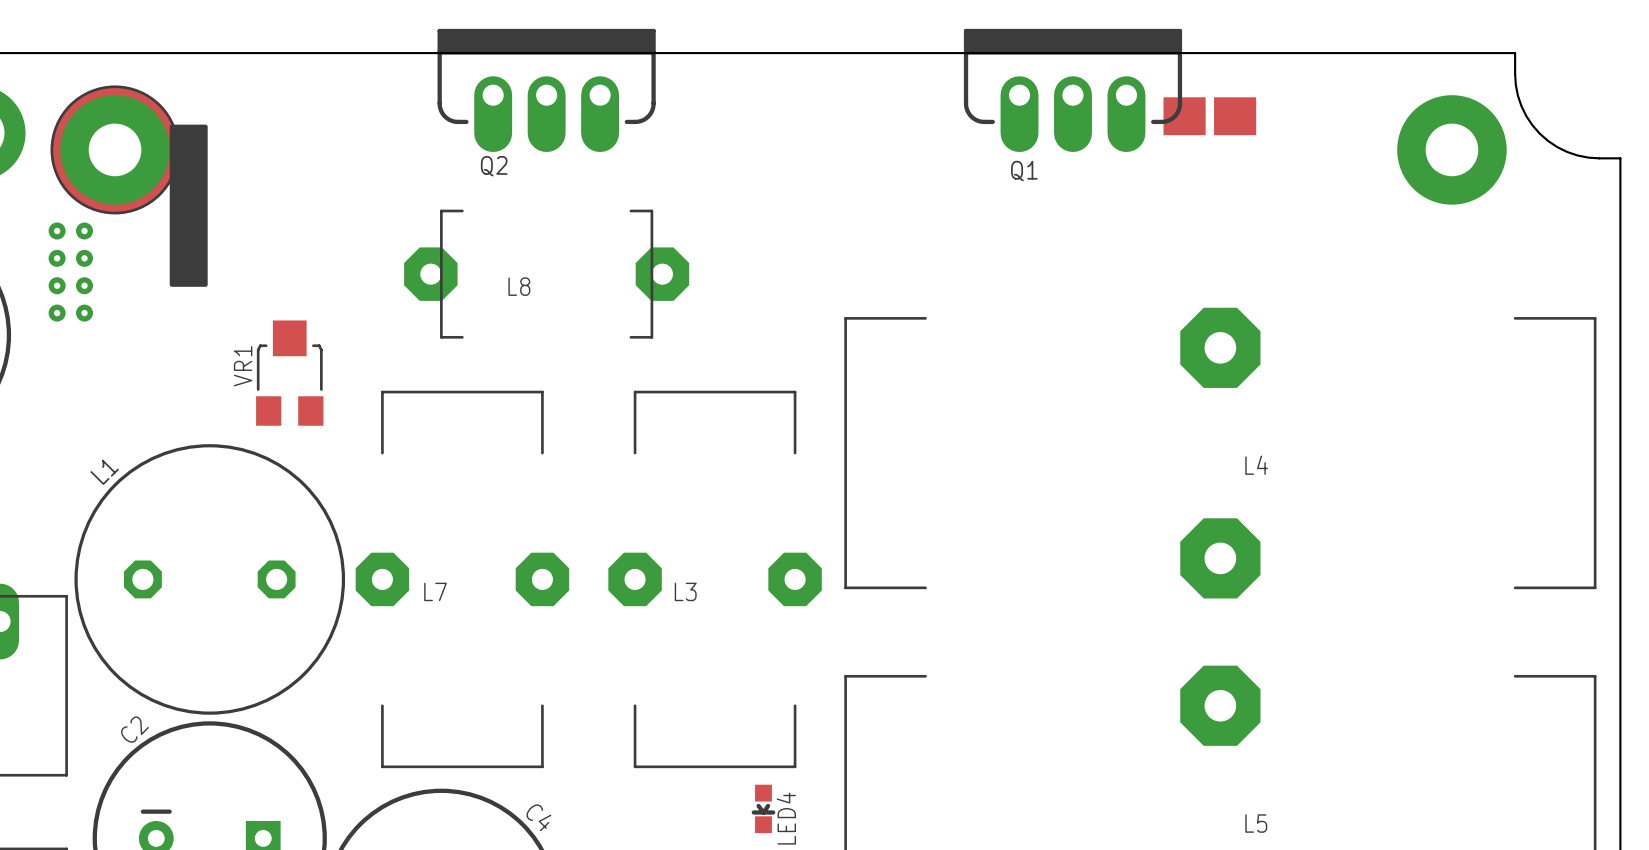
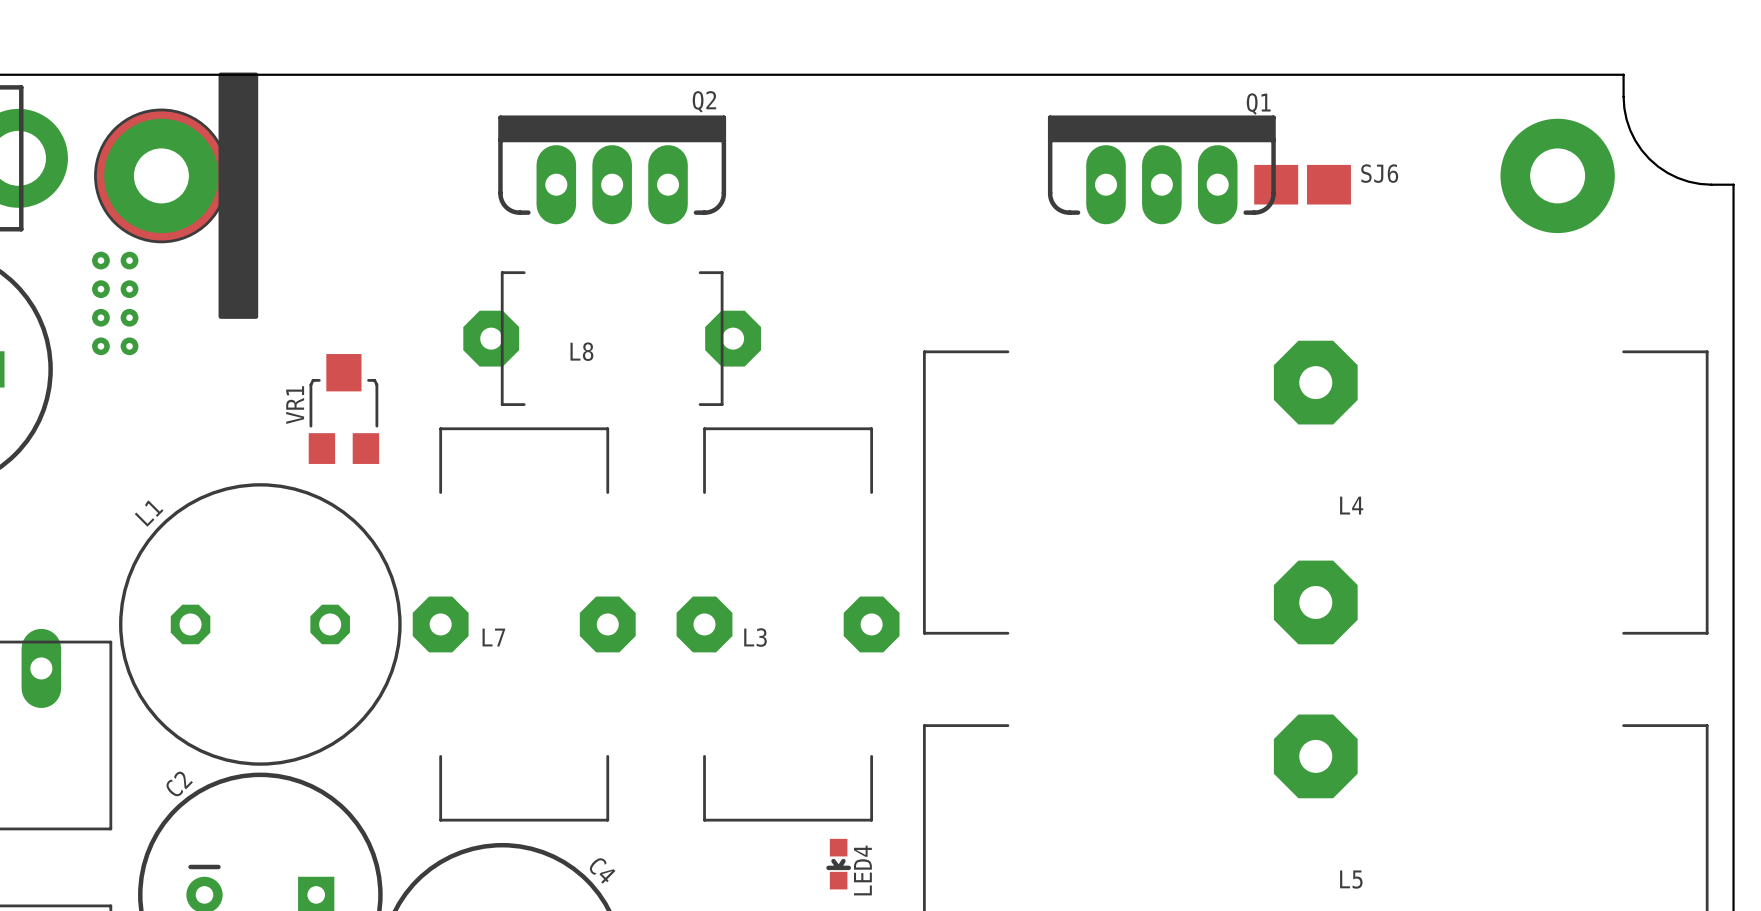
Q2 footprint: [437, 28, 656, 153] -> [498, 115, 727, 225]
Q1 footprint: [963, 28, 1183, 153] -> [1047, 115, 1276, 225]
drawing: none -> [218, 72, 259, 319]
part: (1209, 116) -> none
drawing: [169, 124, 208, 287] -> none
SJ6: none -> (1302, 184)
Q2 name position: Q2 (494, 166) -> Q2 (704, 101)
Q1 name position: Q1 (1024, 171) -> Q1 (1258, 104)
L8 position: (546, 274) -> (612, 338)

